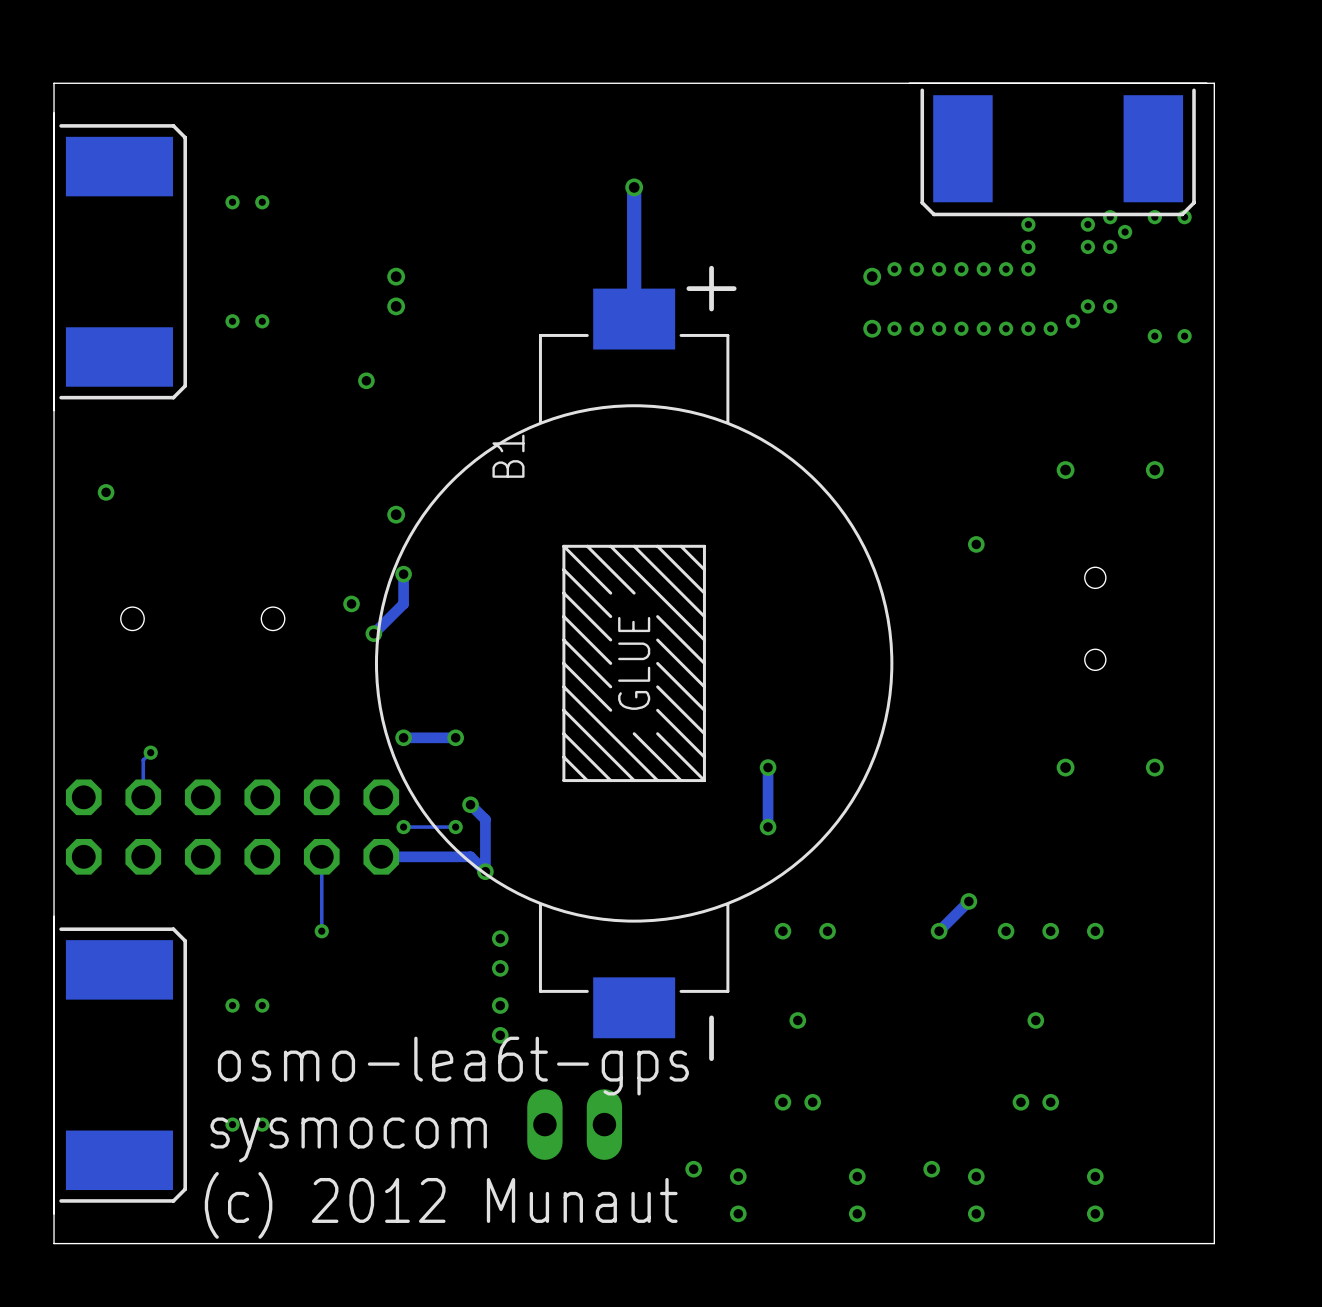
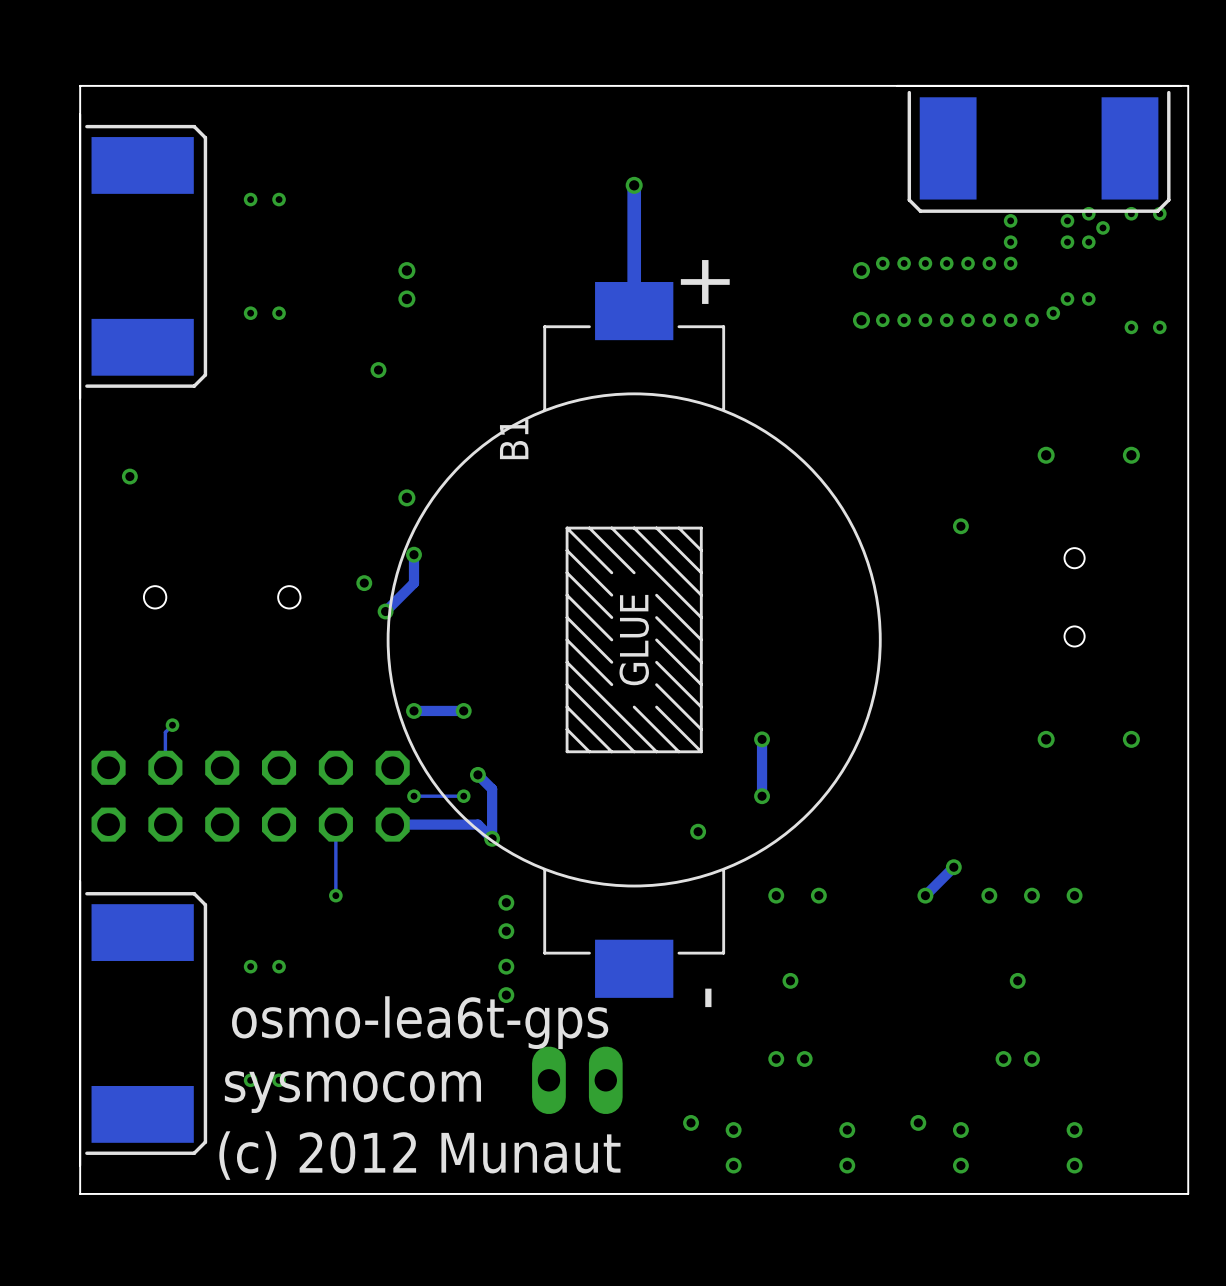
via: none -> (698, 831)

